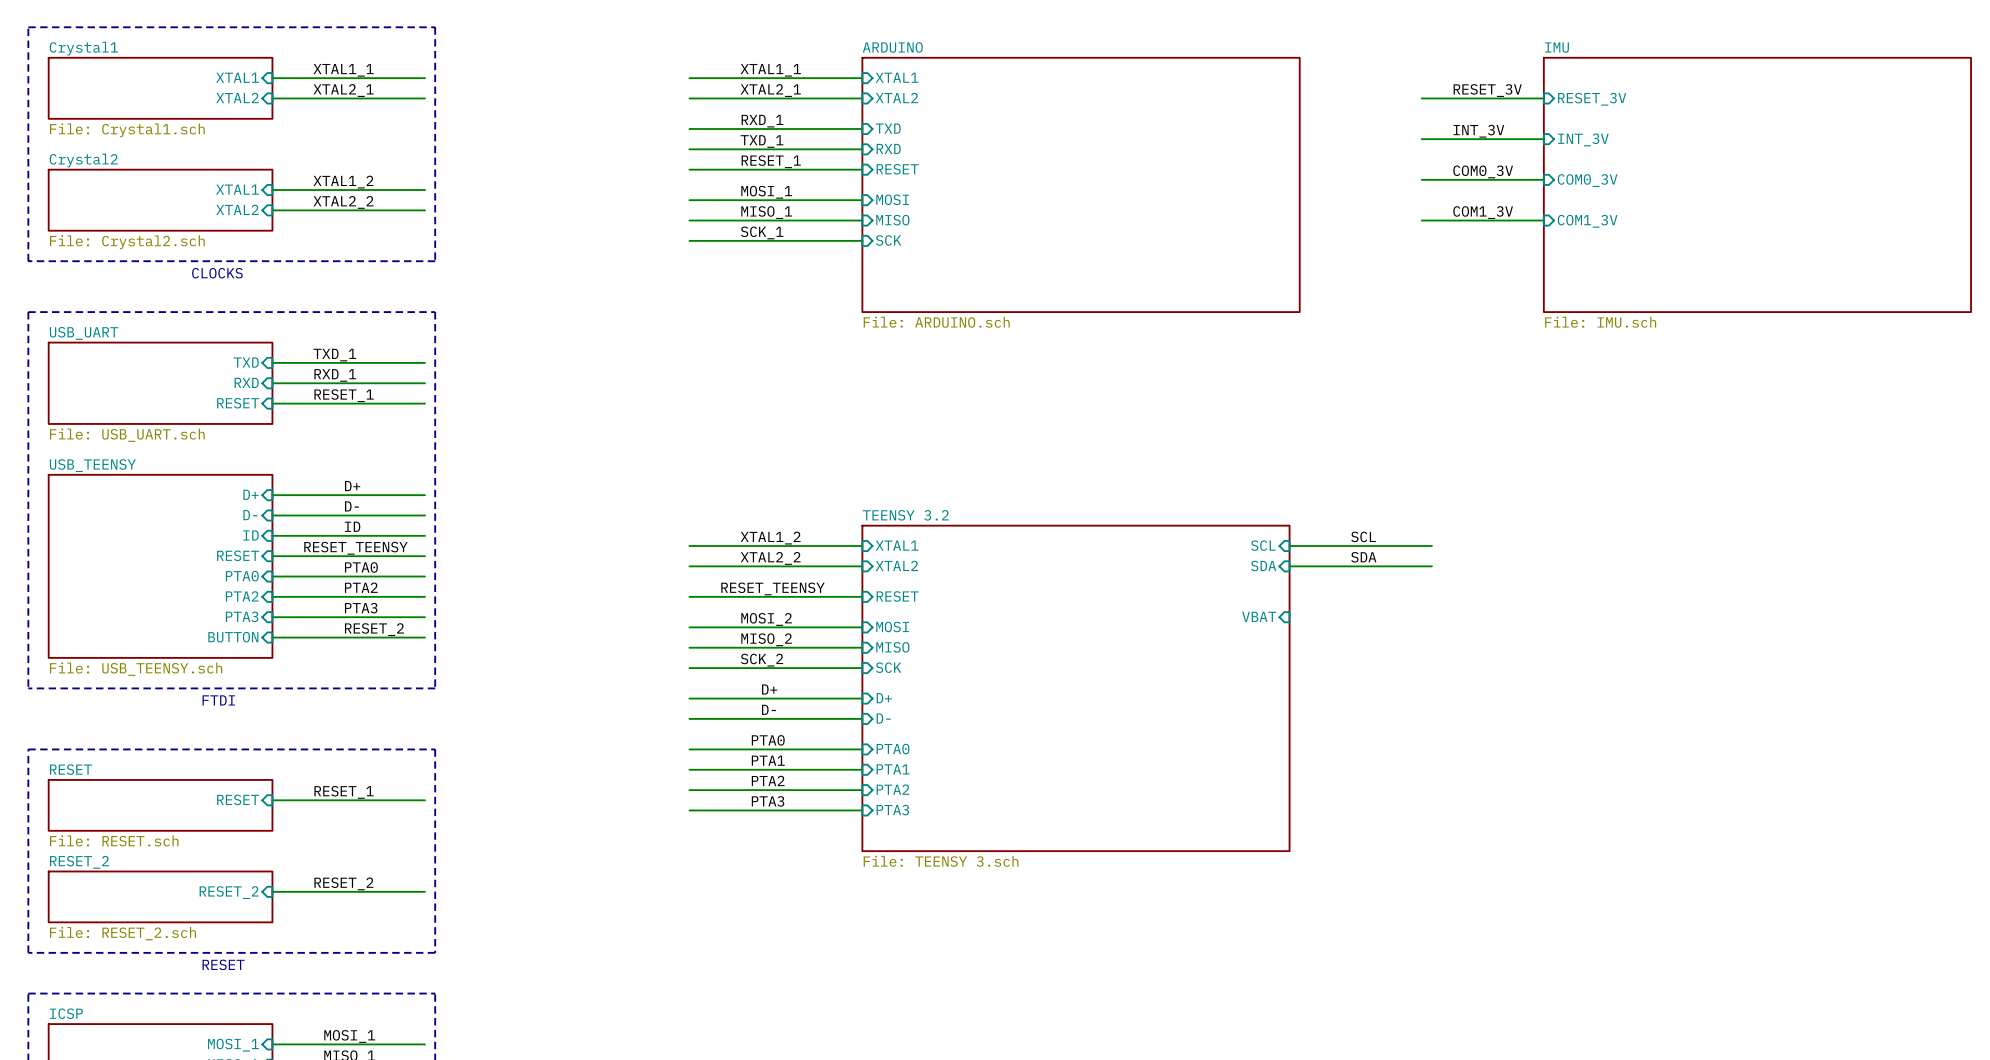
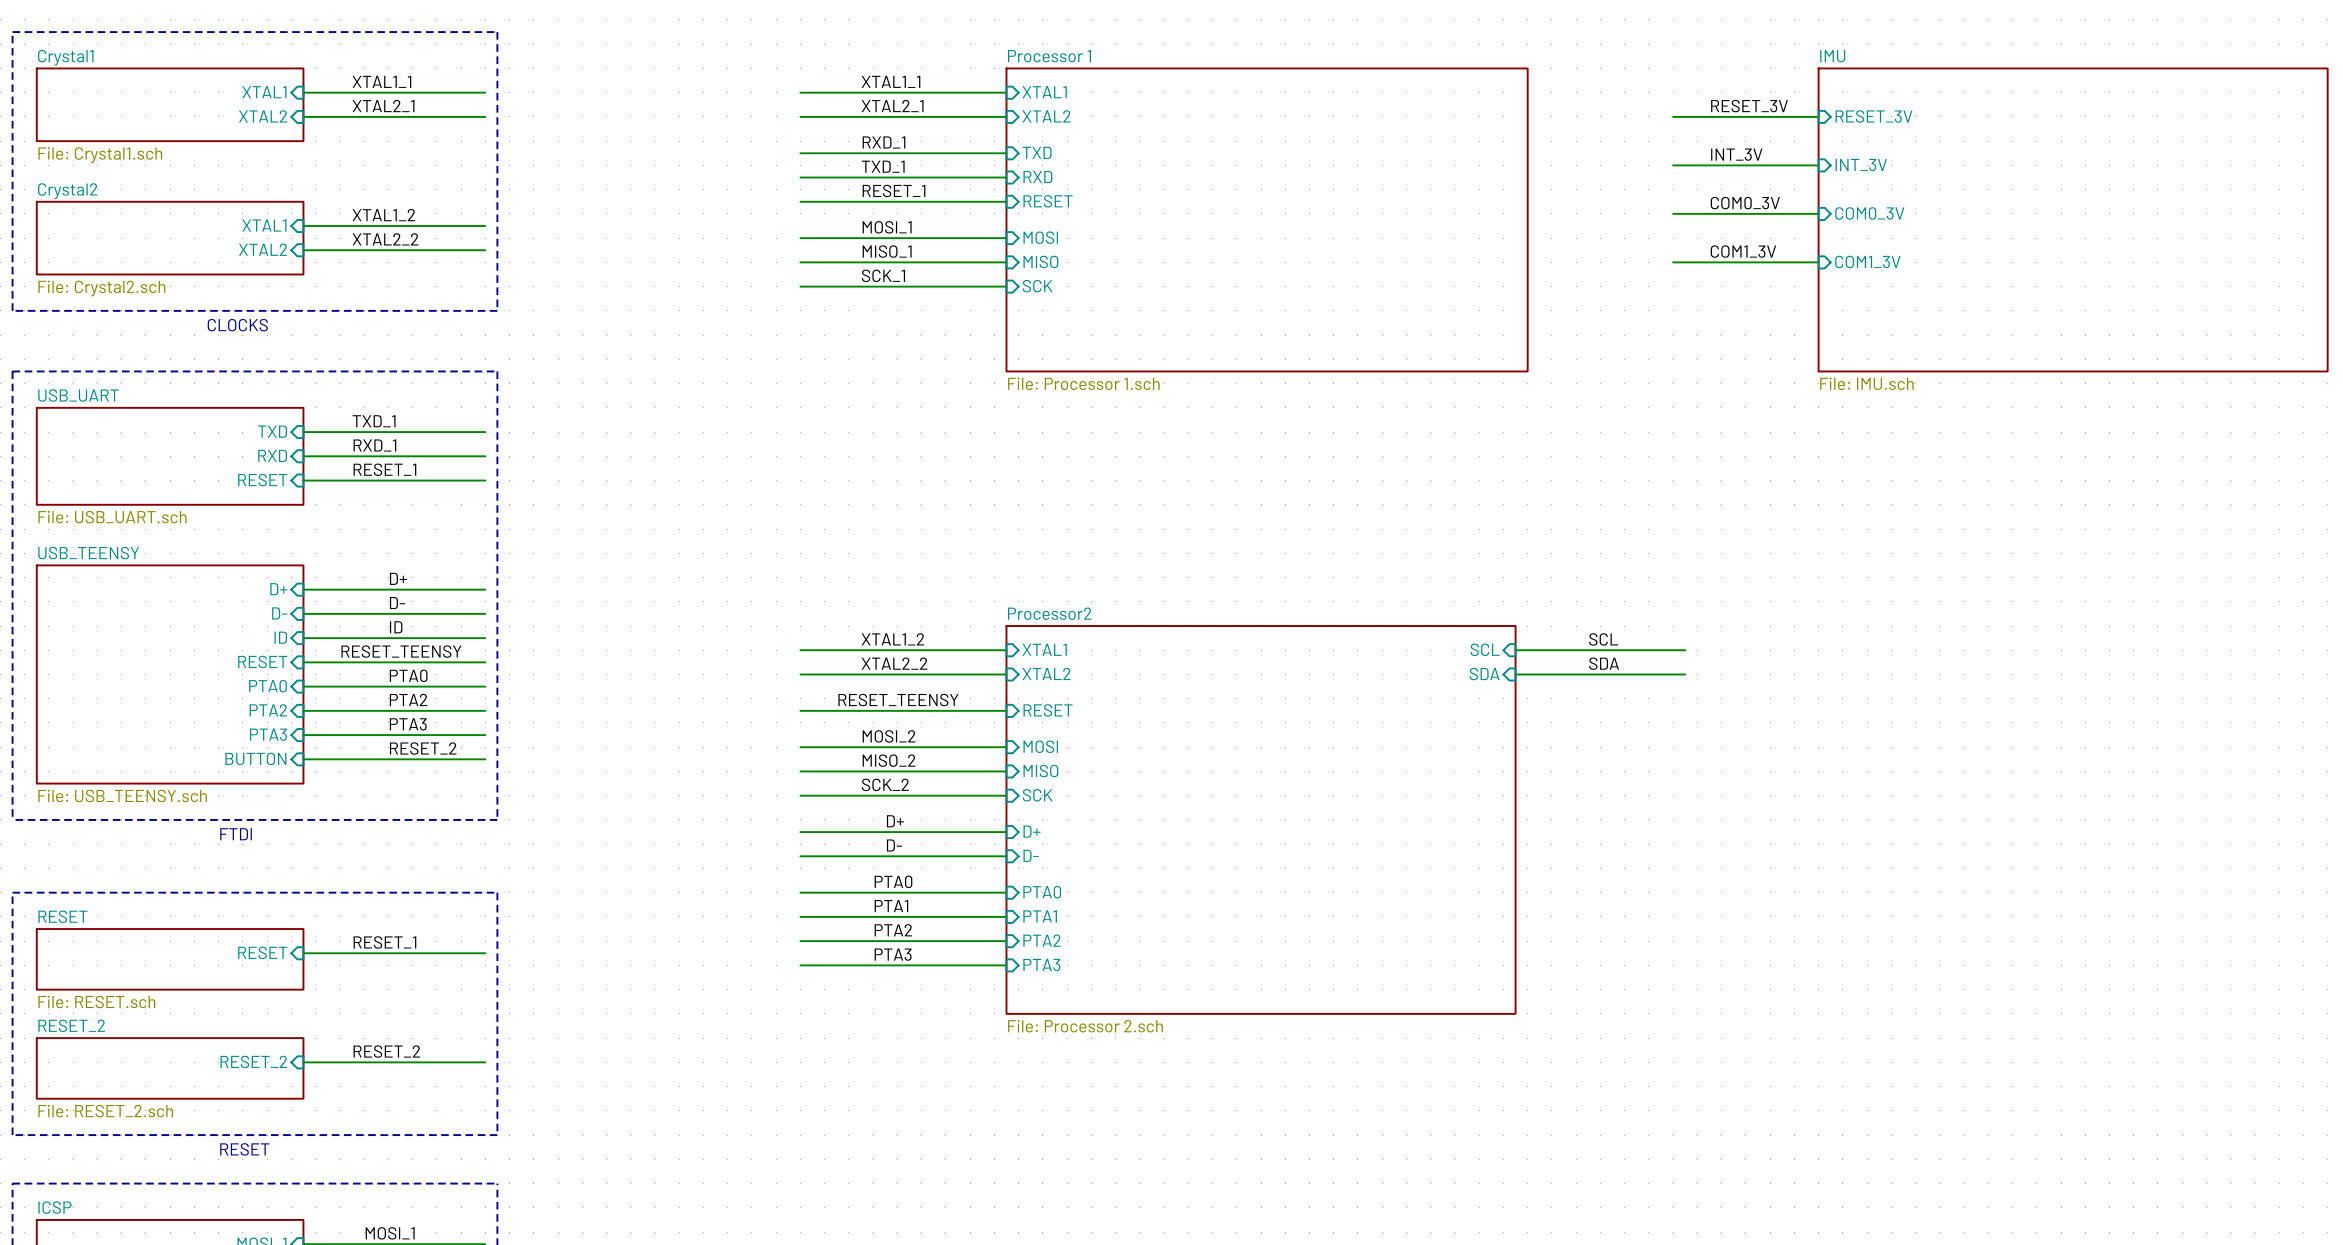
sheet ARDUINO name: ARDUINO (892, 47) -> Processor 1 (1049, 56)
sheet ARDUINO value: File: ARDUINO.sch (936, 322) -> File: Processor 1.sch (1083, 383)
sheet TEENSY 3.2 name: TEENSY 3.2 (905, 515) -> Processor2 (1049, 613)
sheet pin: VBAT (1259, 616) -> none
sheet TEENSY 3.2 value: File: TEENSY 3.sch (941, 861) -> File: Processor 2.sch (1085, 1026)

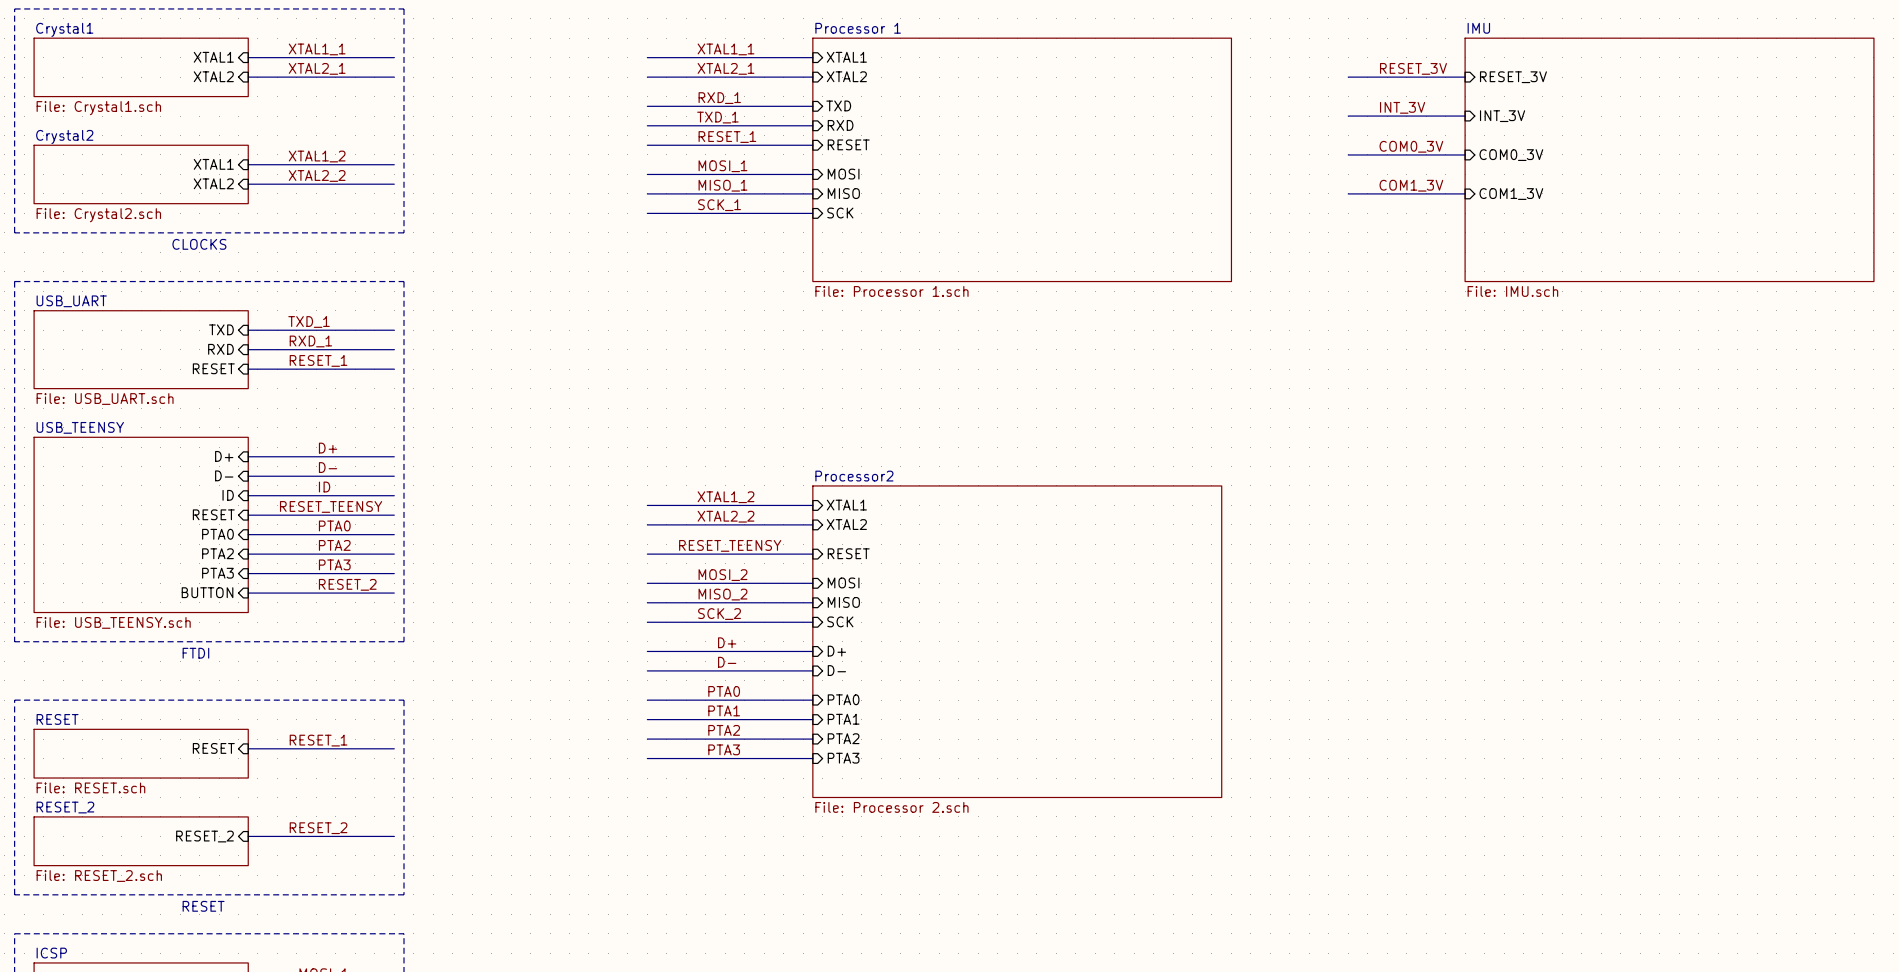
label: SCL (1603, 639) -> none
sheet pin: SCL (1485, 649) -> none
wire: (1515, 650) (1685, 650) -> none
label: SDA (1604, 663) -> none
sheet pin: SDA (1484, 674) -> none
wire: (1515, 674) (1685, 674) -> none

